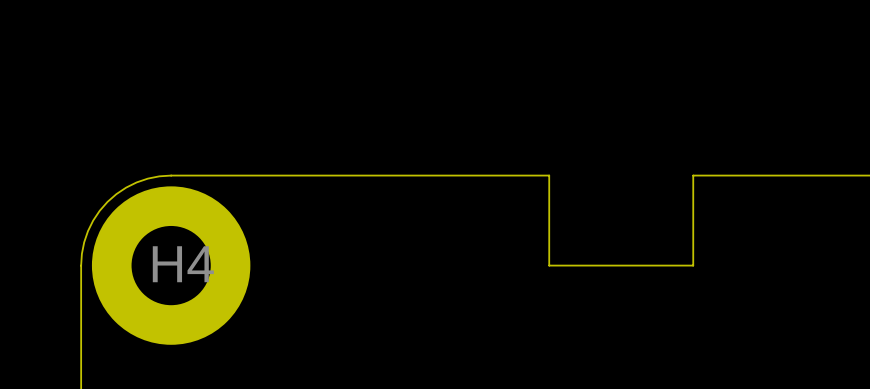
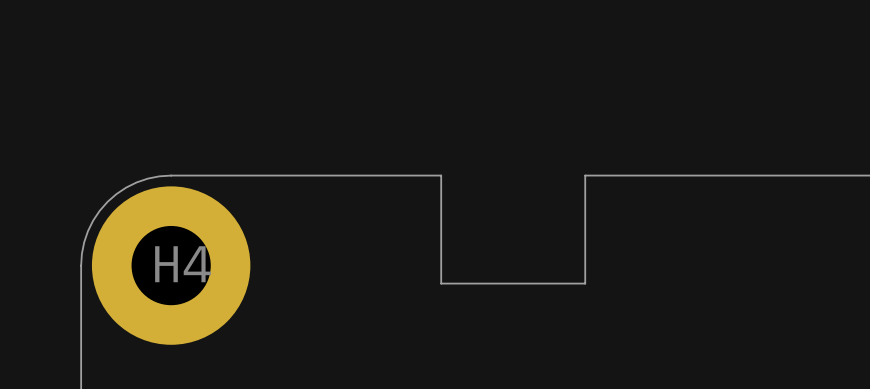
board edge: (441, 175) (549, 175) (549, 265) (693, 265) (693, 175) -> (441, 175) (441, 283) (585, 283) (585, 175) (693, 175)

